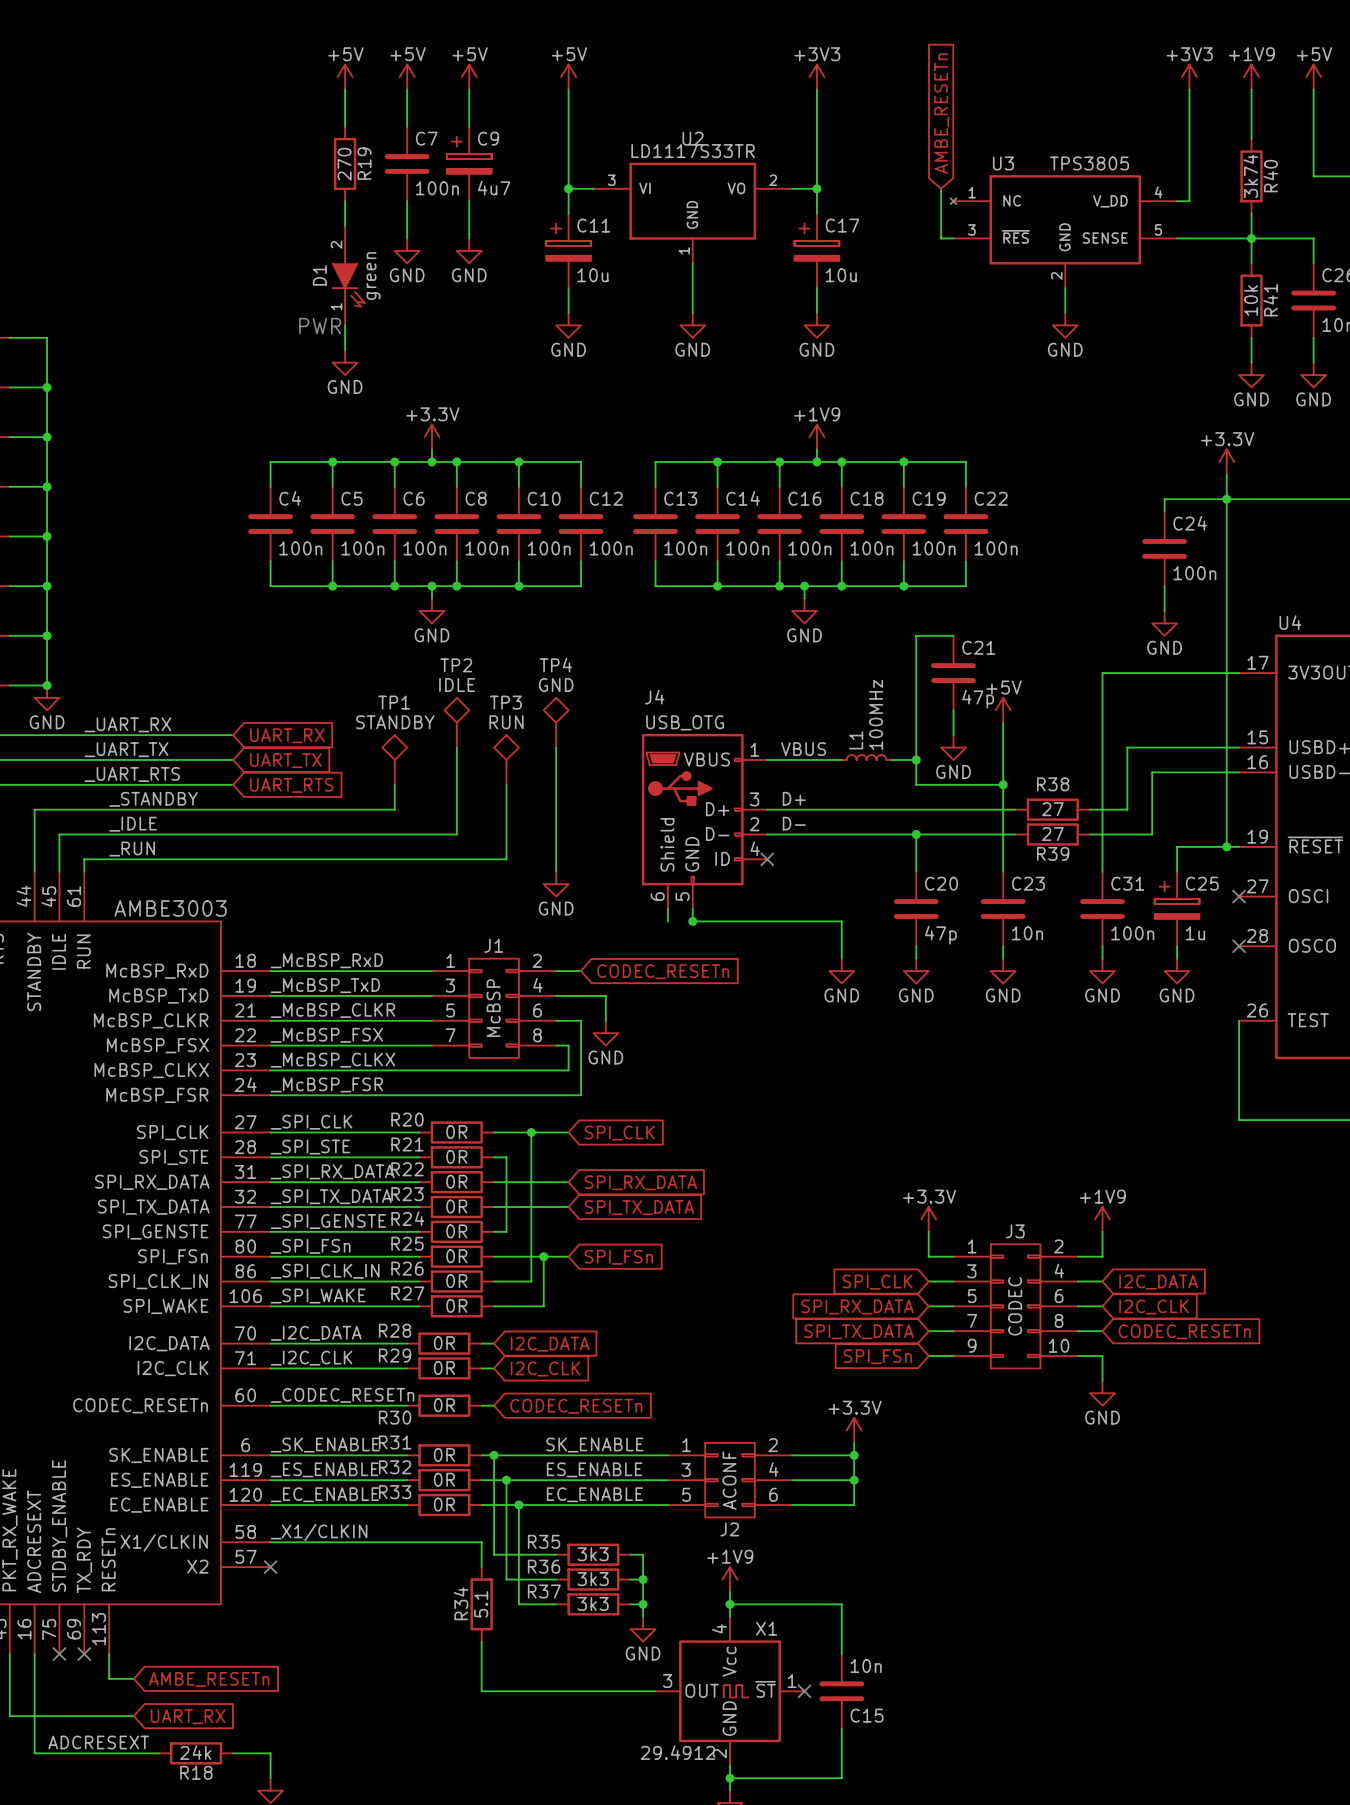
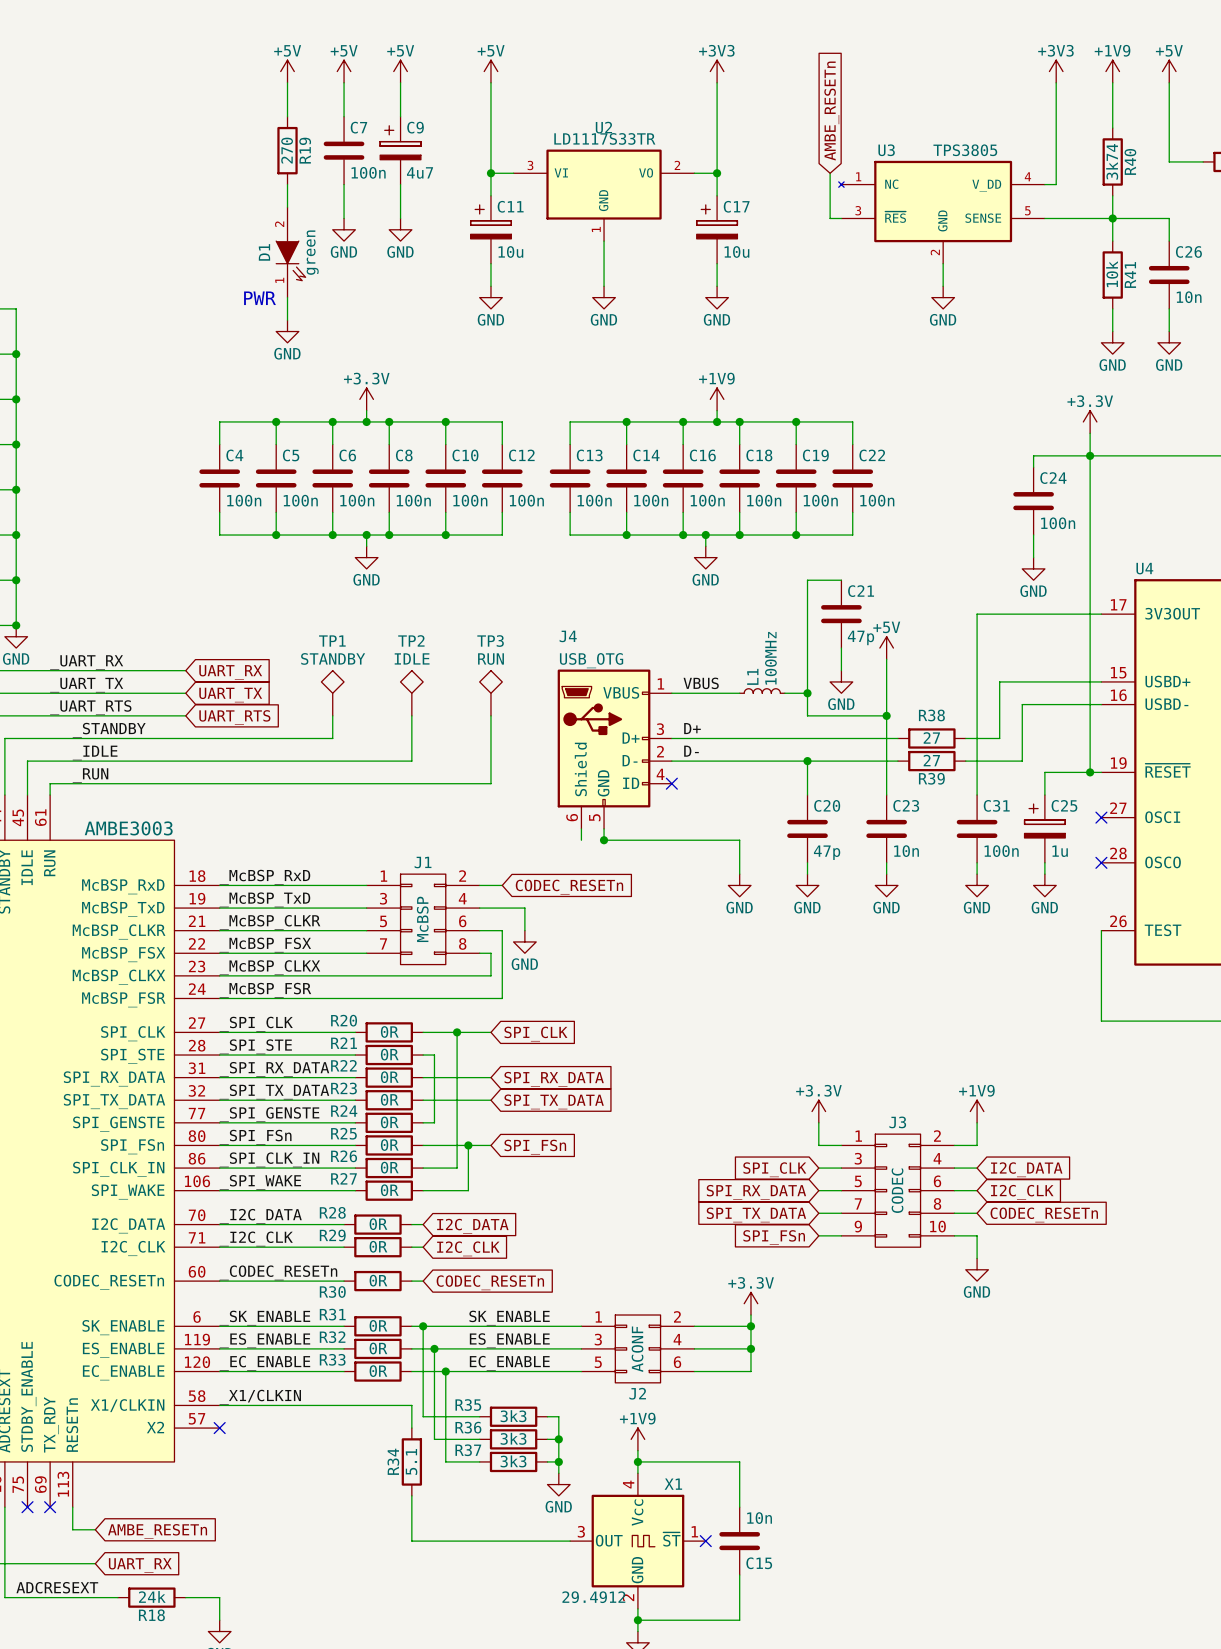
TP2 position: (456, 722) -> (411, 693)
TP4: GND (556, 722) -> none
wire: (456, 747) (456, 834) -> (411, 715) (411, 761) (389, 761)
wire: (556, 747) (556, 871) -> none
TP3 position: (506, 759) -> (490, 693)
wire: (506, 784) (506, 859) -> (490, 715) (490, 783) (434, 783)
power symbol: GND (556, 884) -> none

